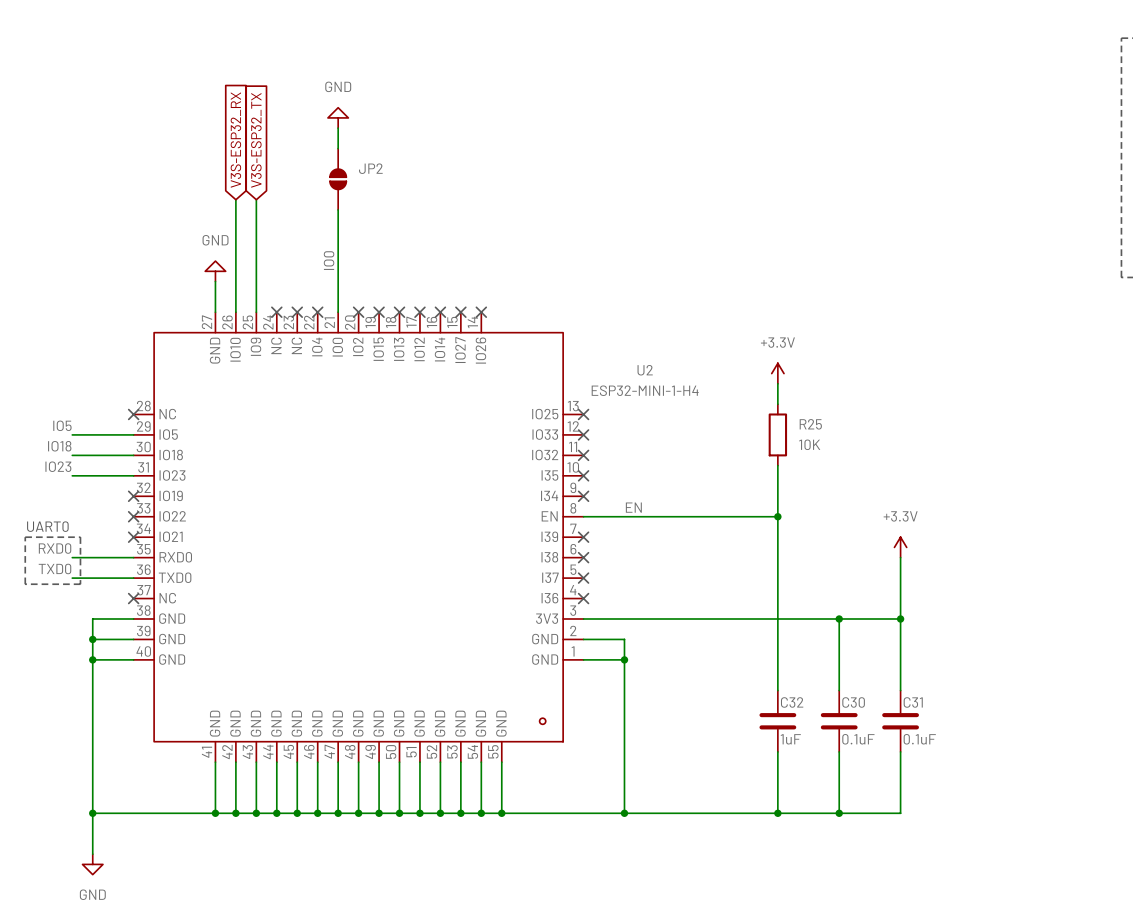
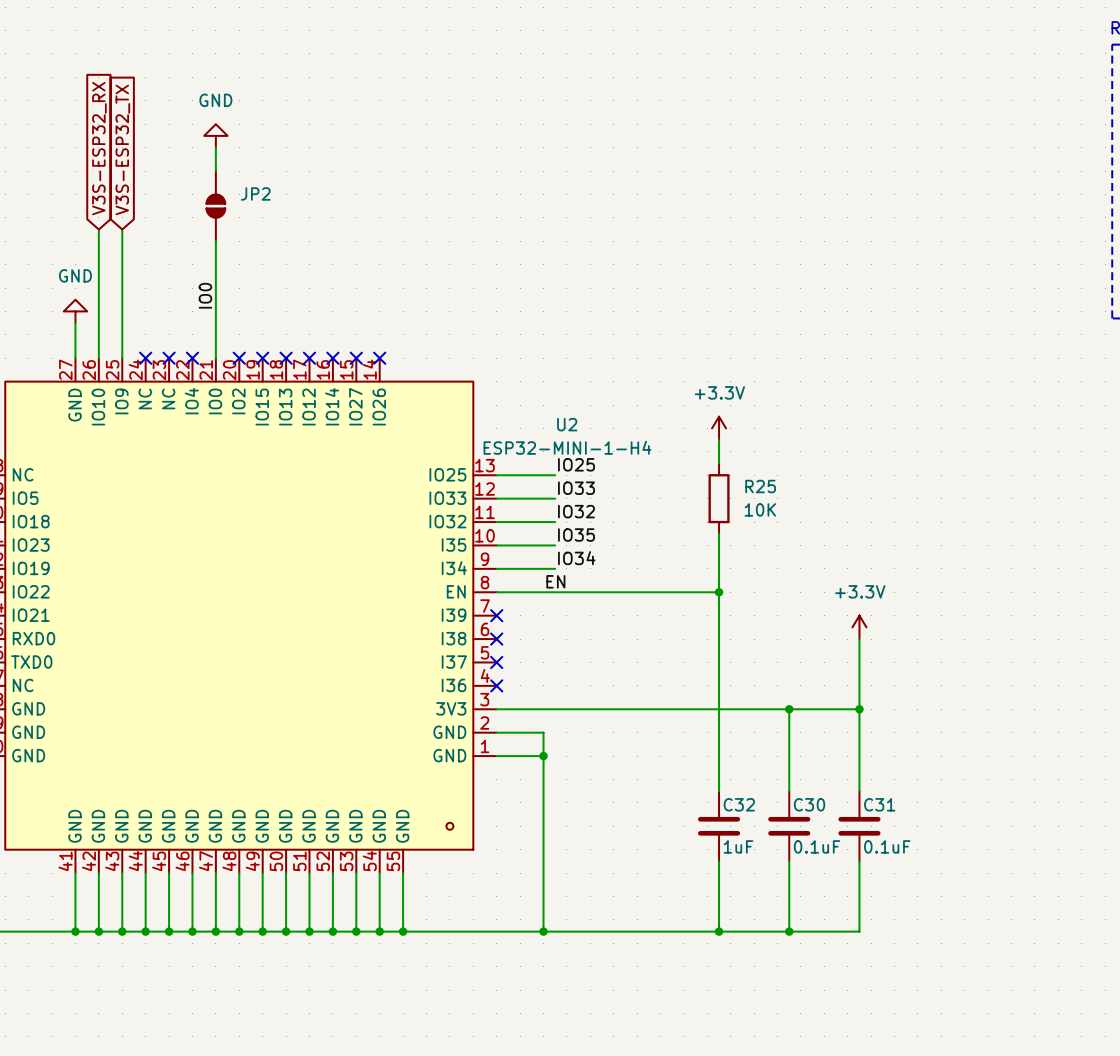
label: none -> IO25 (576, 464)
wire: none -> (496, 475) (555, 475)
no-connect mark: (583, 414) -> none
label: none -> IO33 (576, 488)
wire: none -> (496, 498) (555, 498)
no-connect mark: (583, 434) -> none
label: none -> IO32 (576, 511)
wire: none -> (496, 522) (555, 522)
no-connect mark: (583, 455) -> none
label: none -> IO35 (576, 535)
wire: none -> (496, 545) (555, 545)
no-connect mark: (583, 475) -> none
label: none -> IO34 (576, 558)
wire: none -> (496, 568) (555, 568)
no-connect mark: (583, 496) -> none

